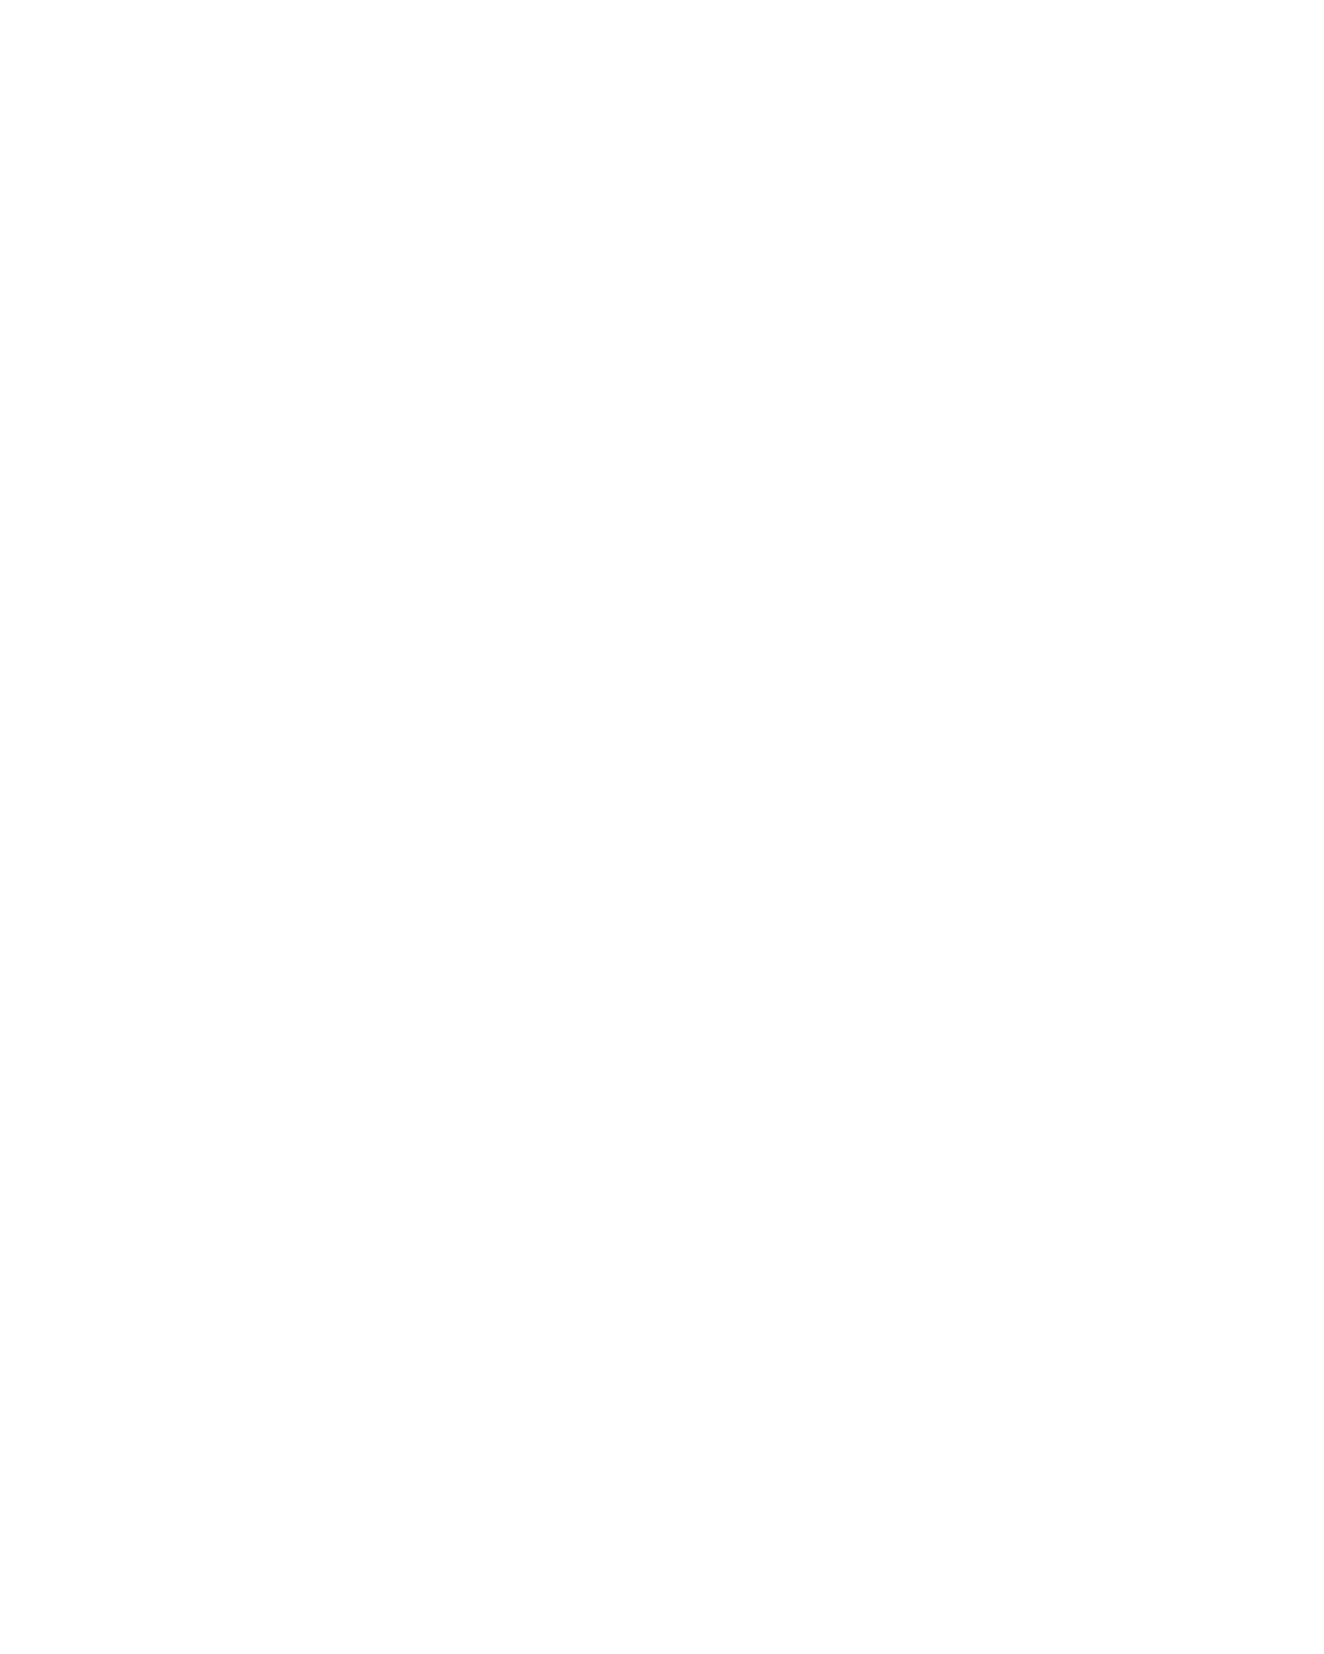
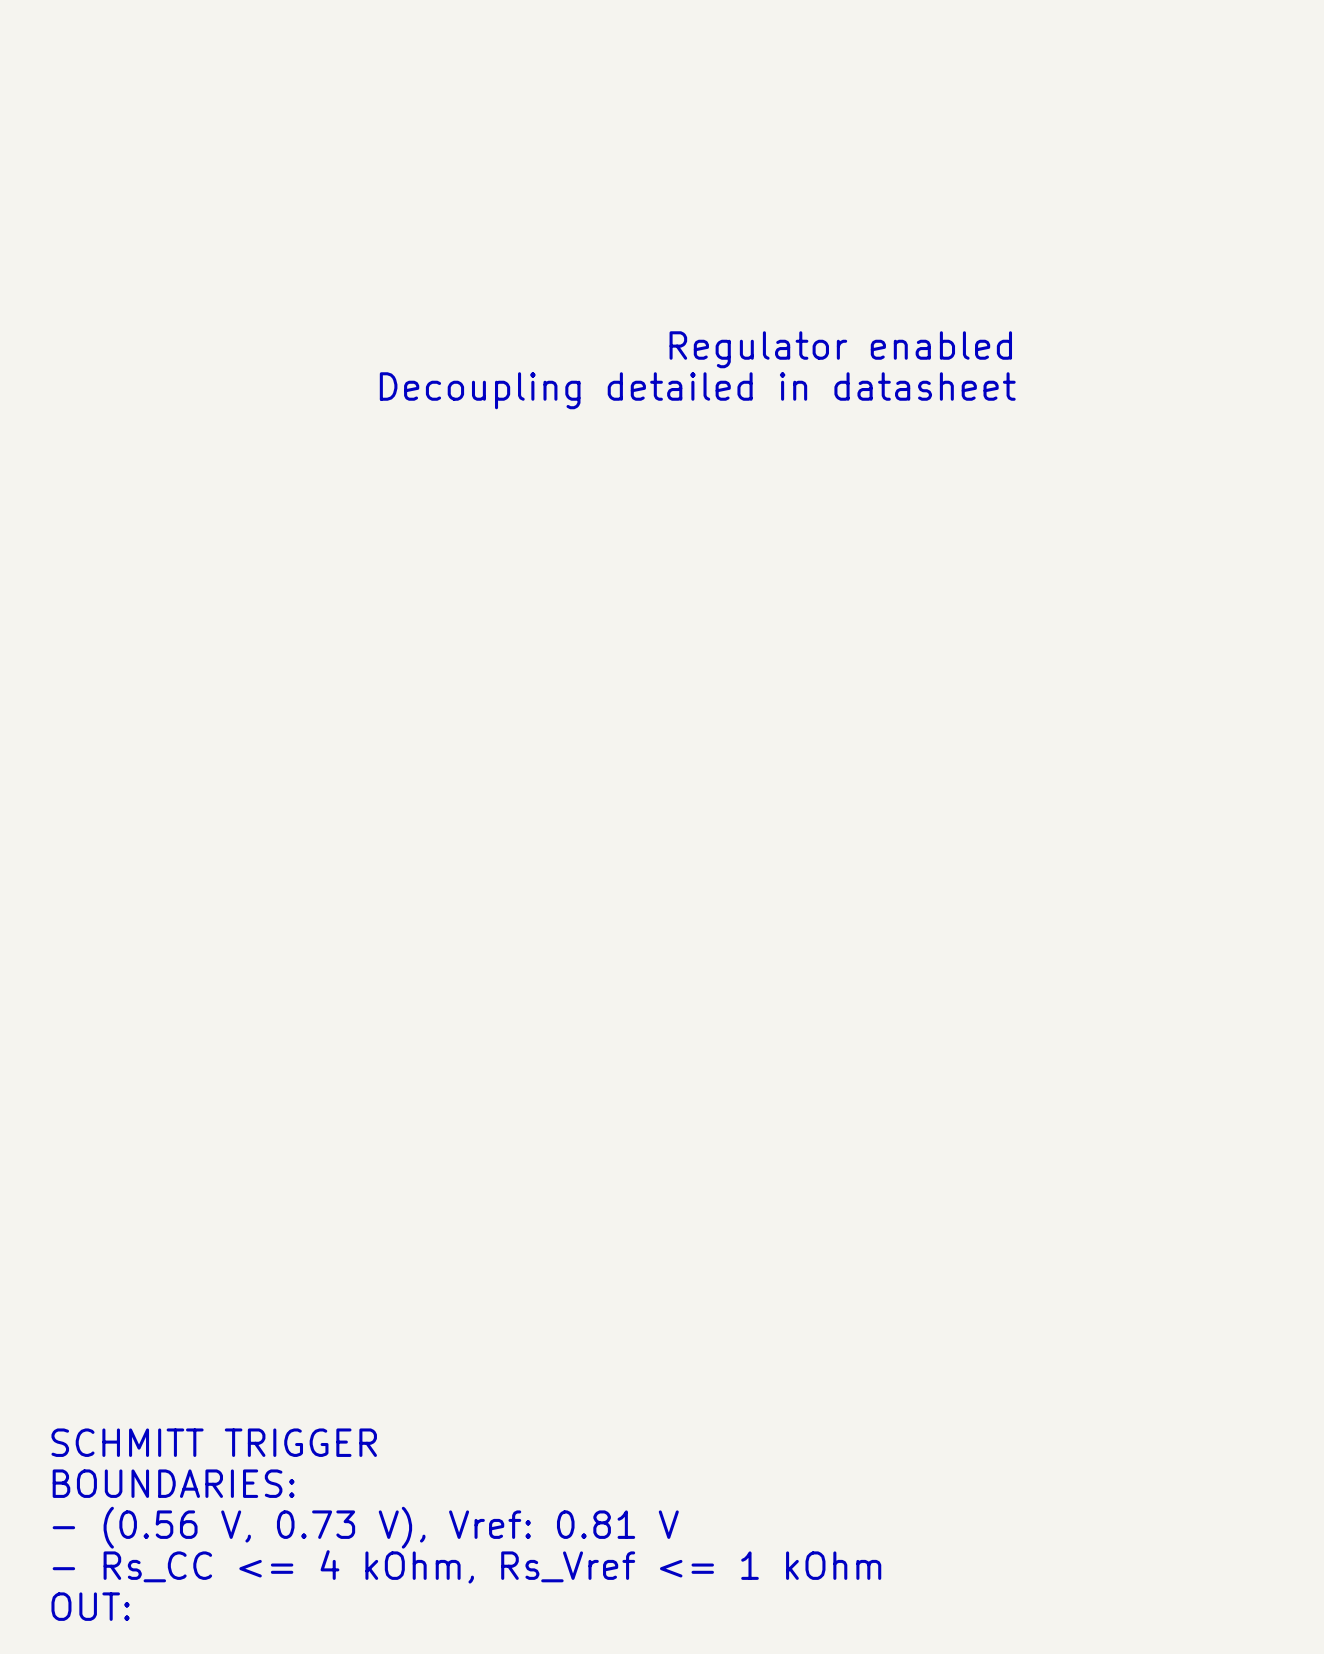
text: none -> Regulator enabled (840, 349)
text: none -> Decoupling detailed in datasheet (697, 390)
text: none -> SCHMITT TRIGGER (214, 1442)
text: none -> BOUNDARIES: (173, 1483)
text: none -> - (0.56 V, 0.73 V), Vref: 0.81 V (365, 1527)
text: none -> - Rs_CC <= 4 kOhm, Rs_Vref <= 1 kOhm (466, 1566)
text: none -> OUT: (90, 1606)

